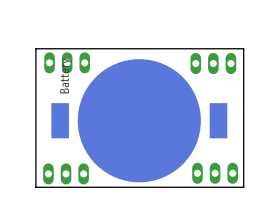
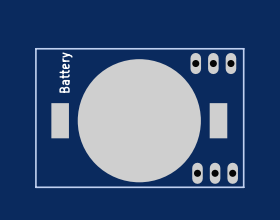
part: (67, 62) -> none
part: (66, 173) -> none

